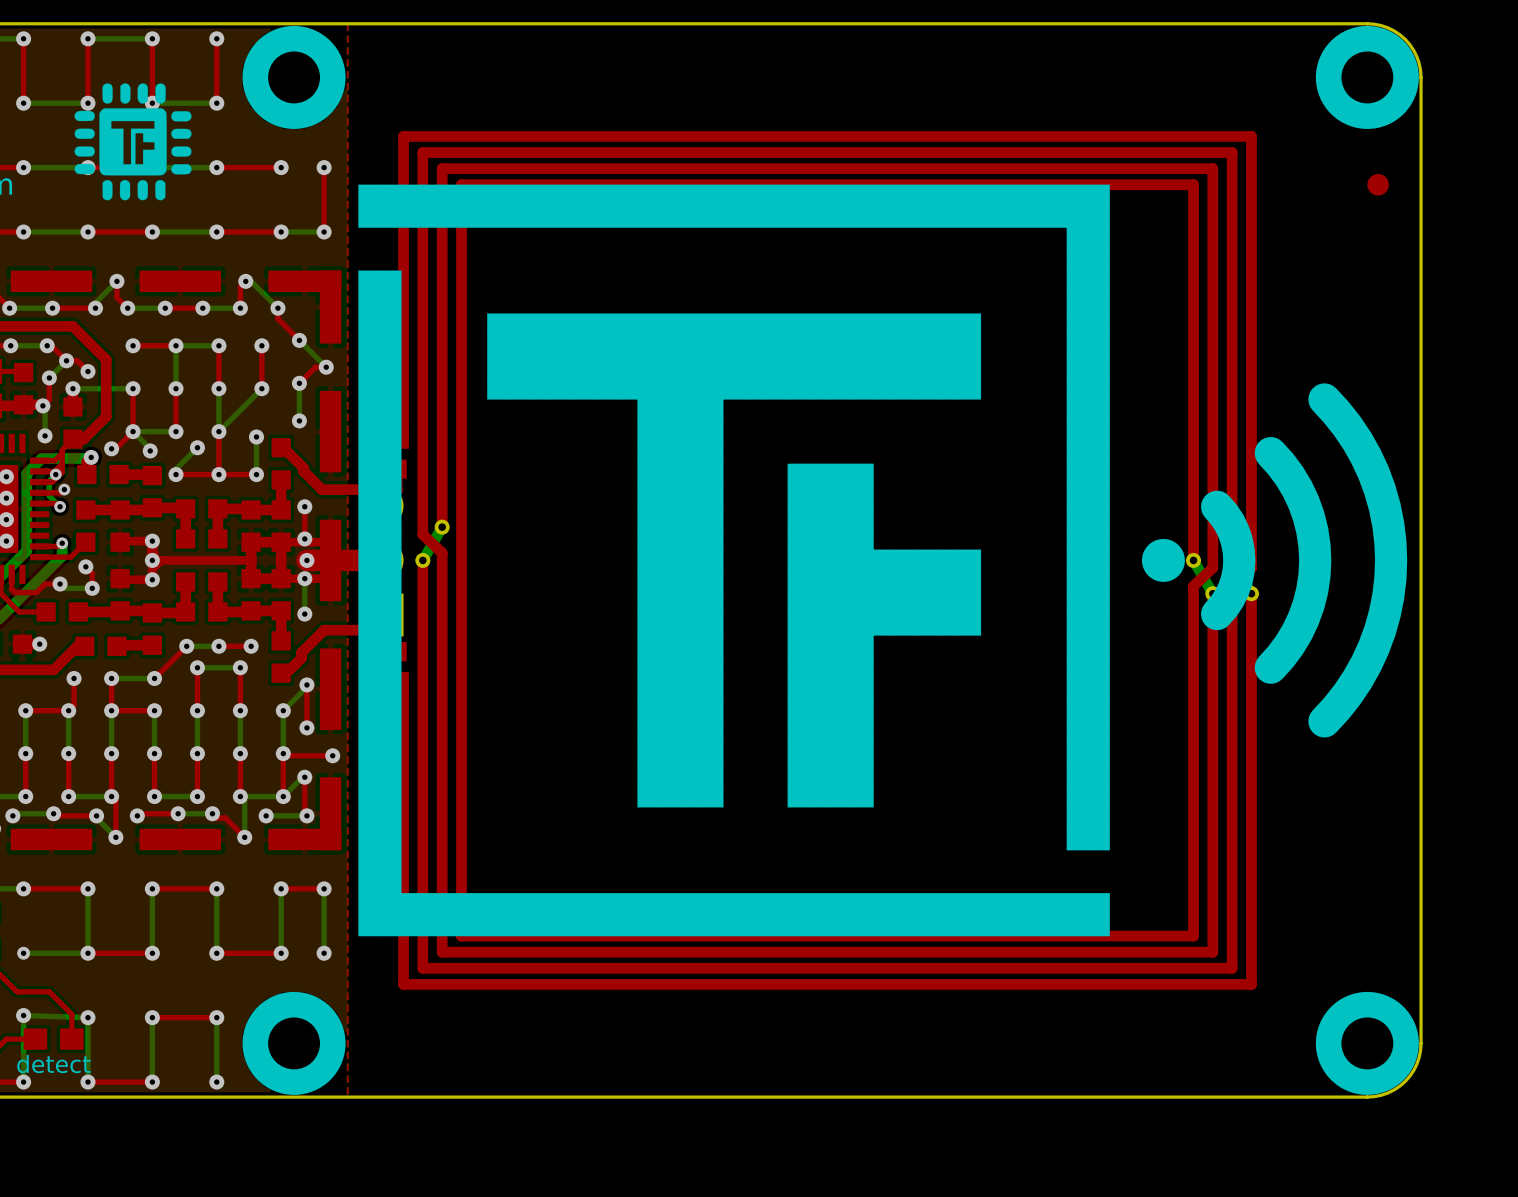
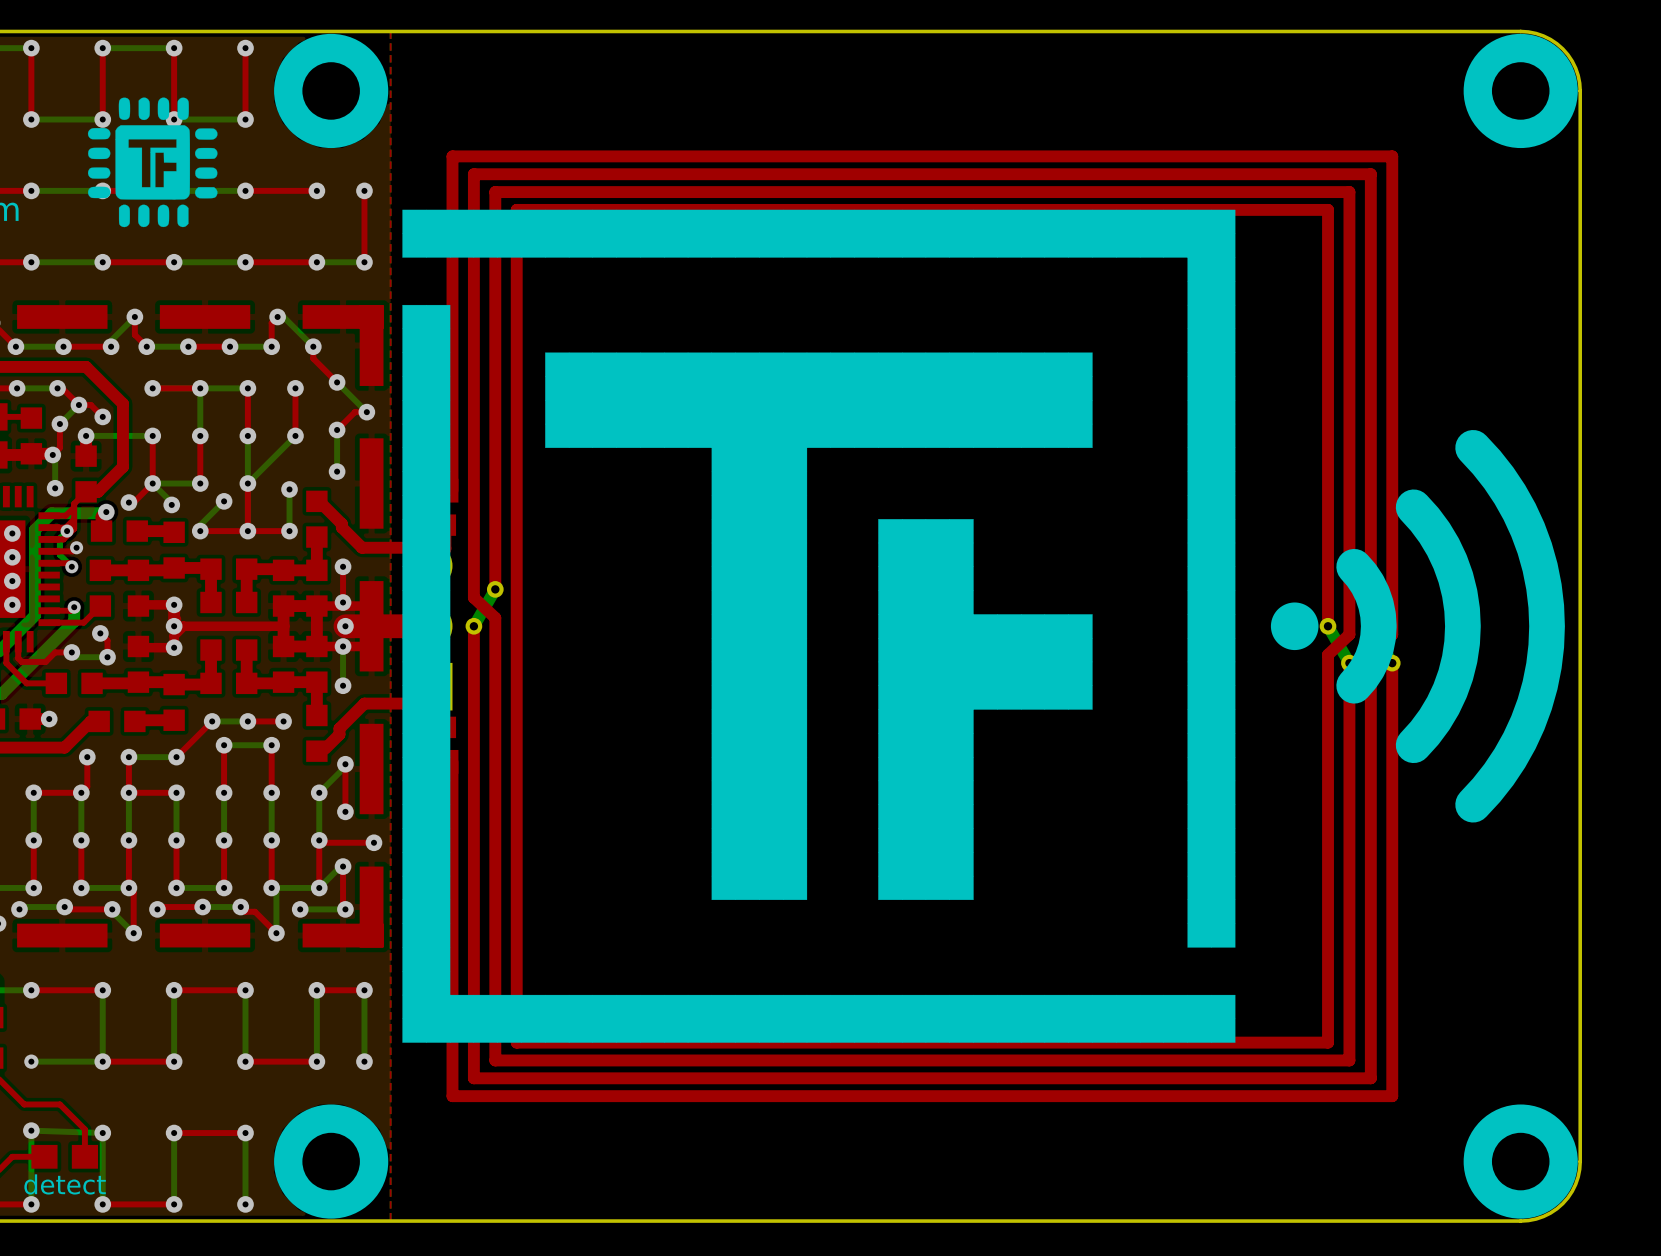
part: (1378, 184) -> none

